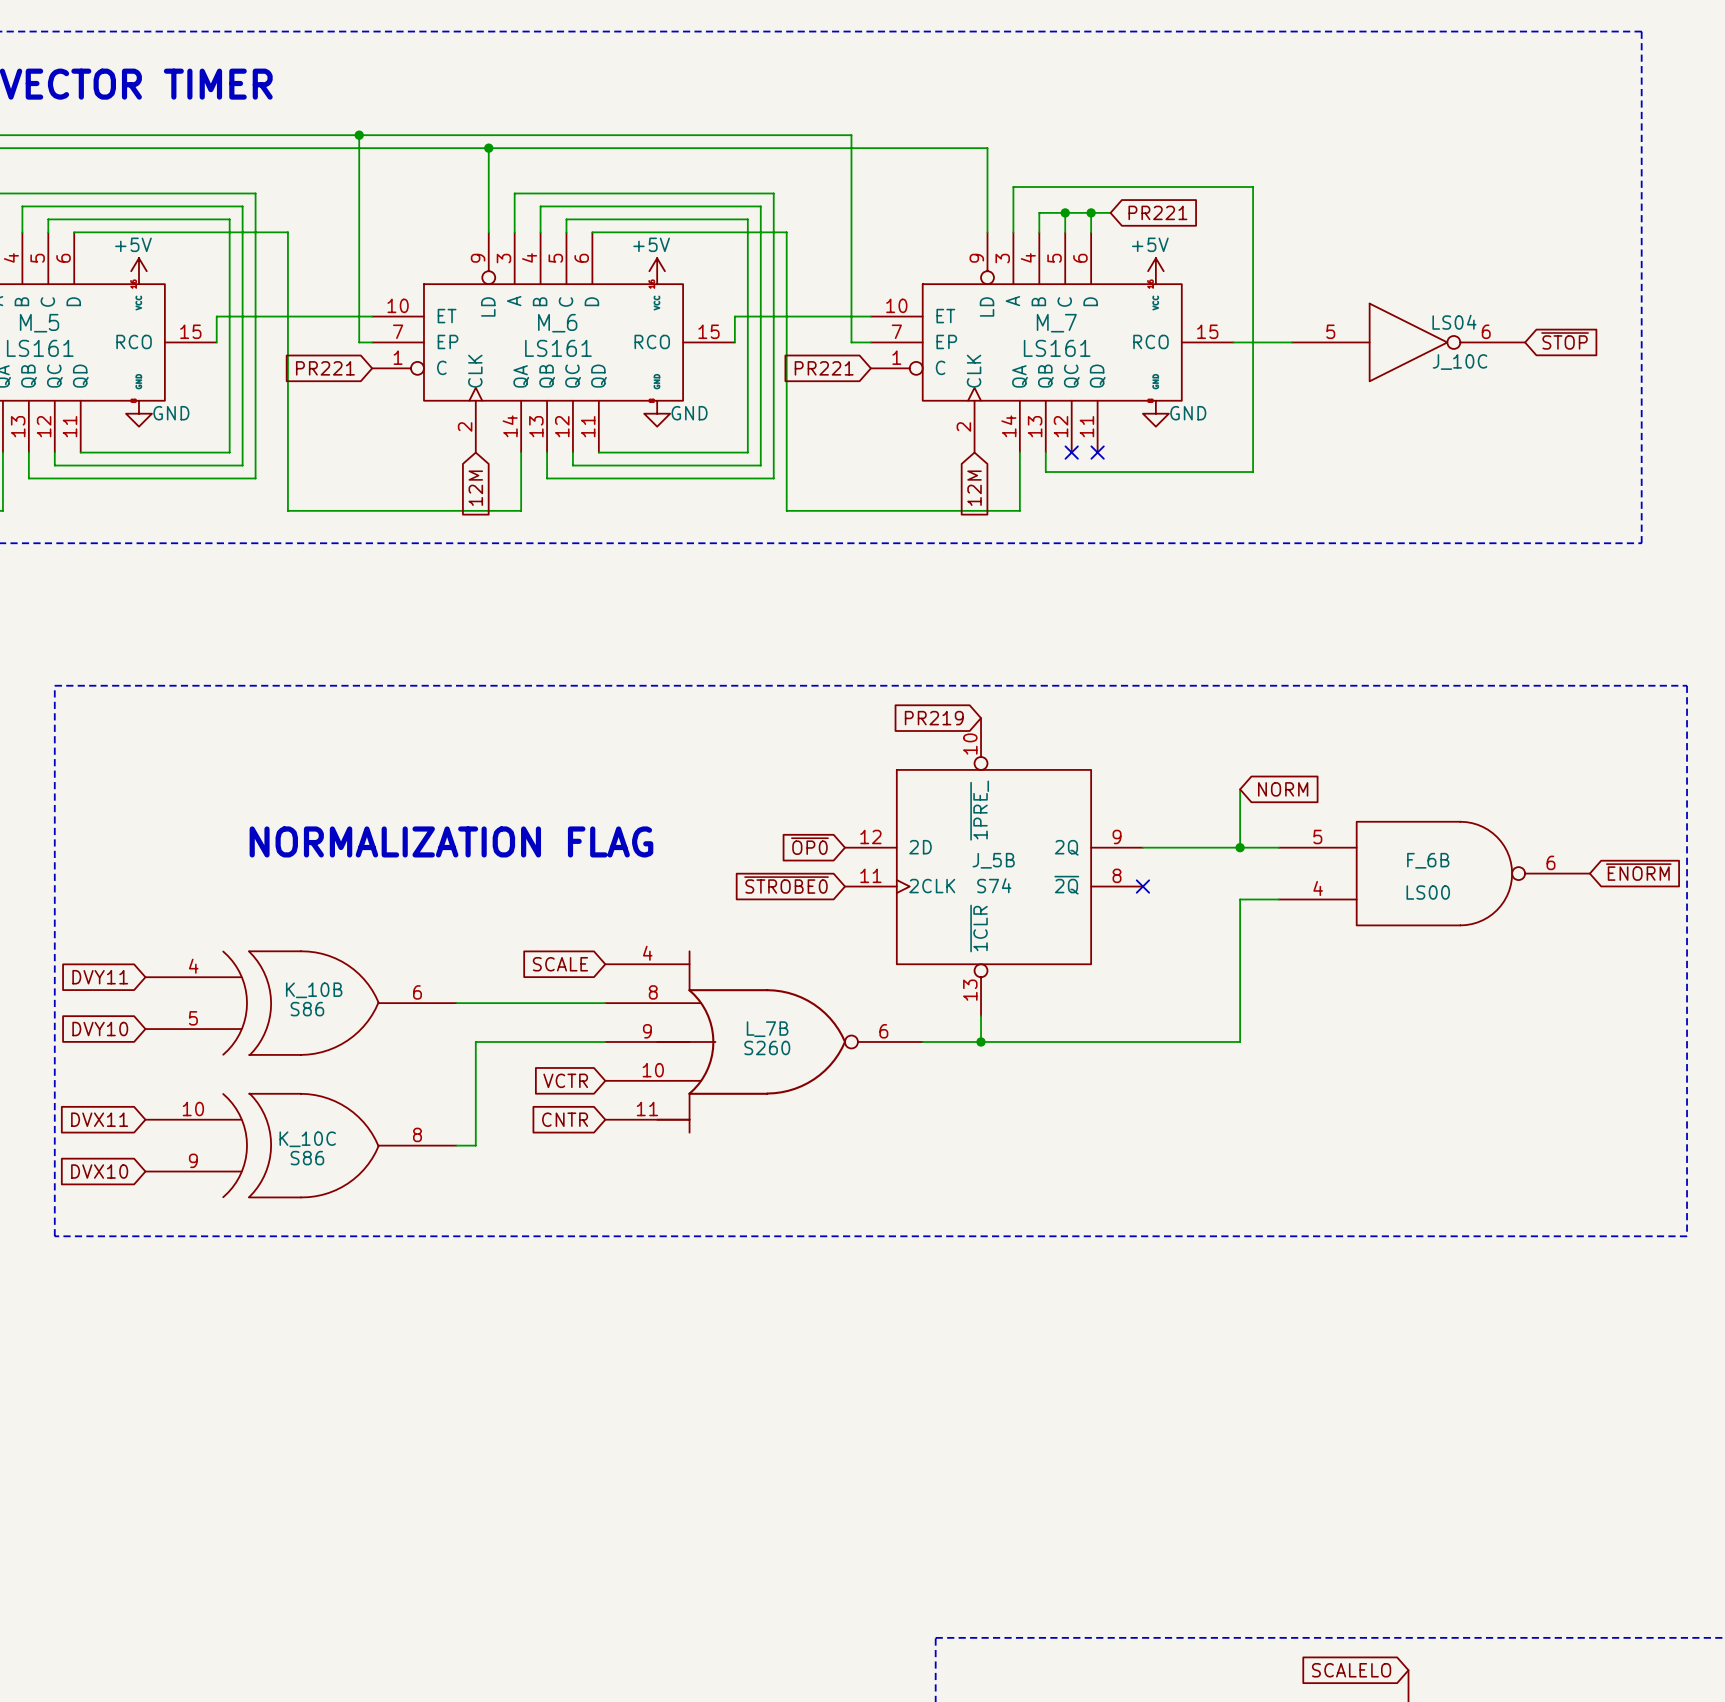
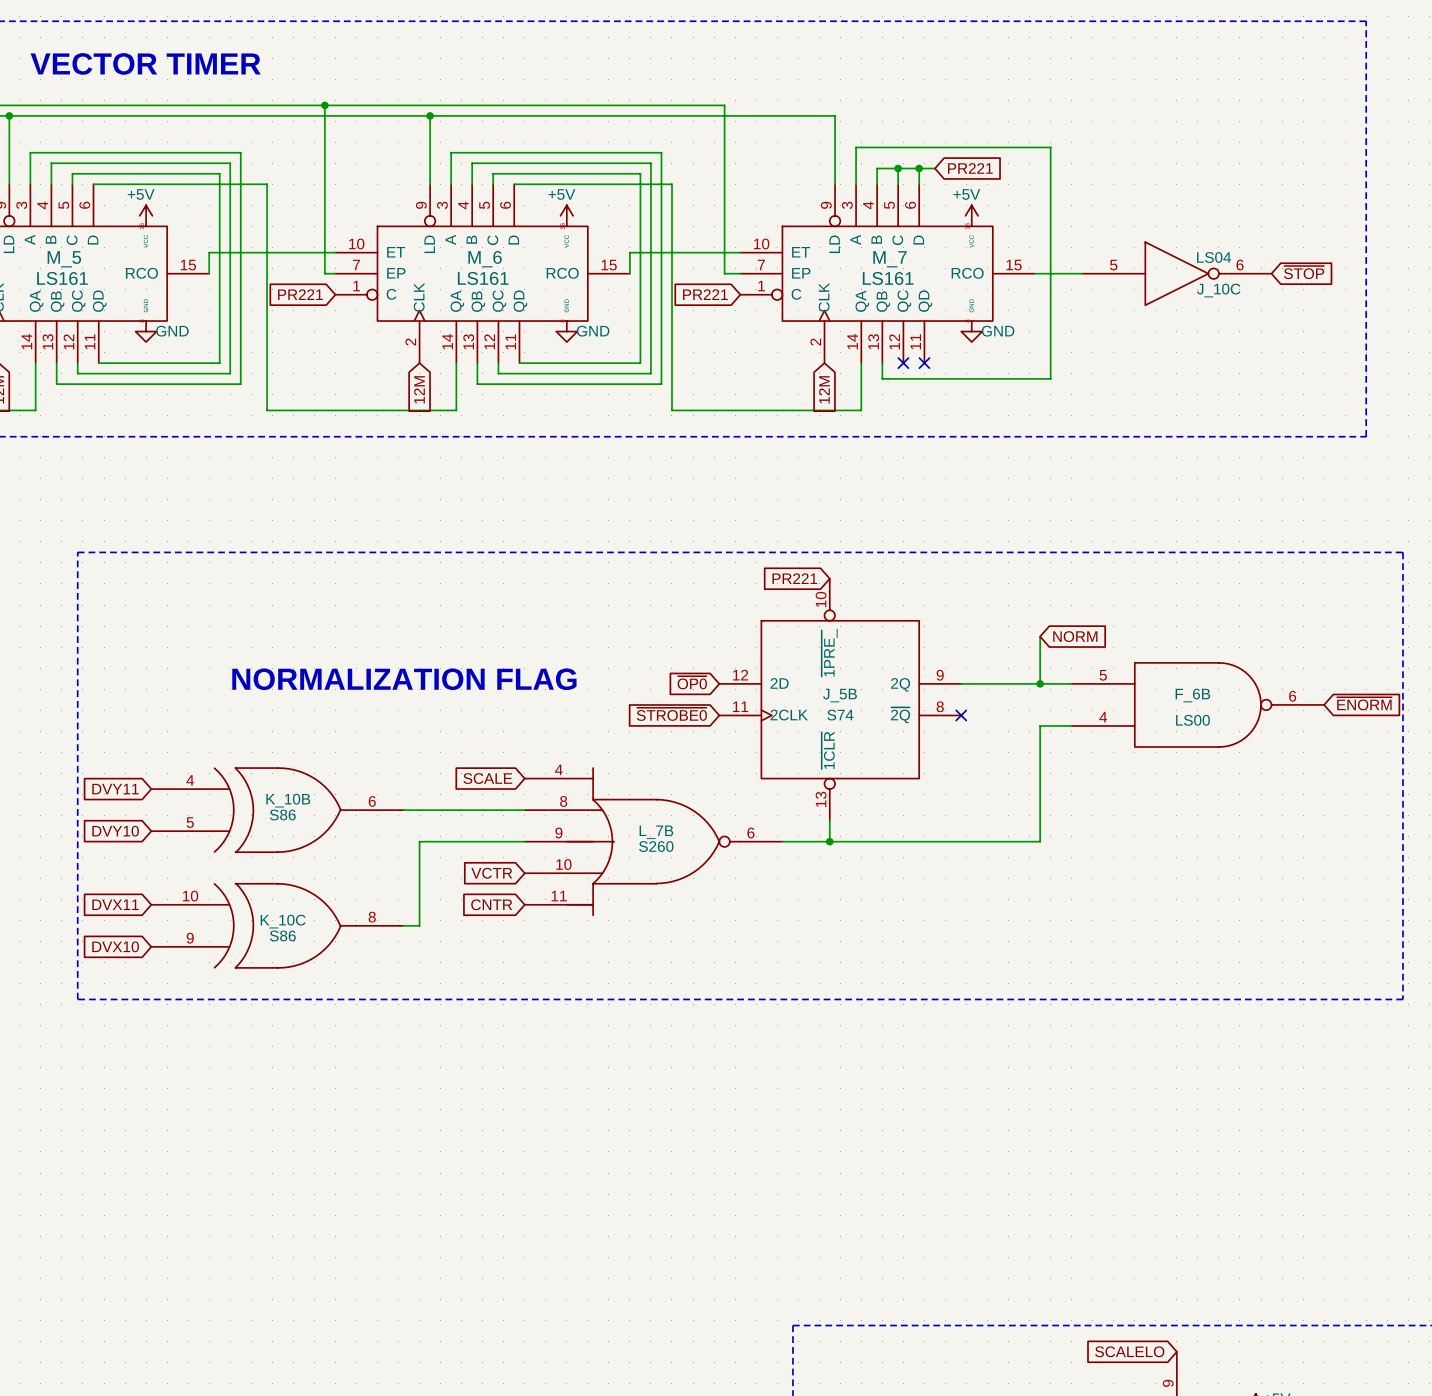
global label: PR219 (934, 718) -> PR221 (794, 578)

